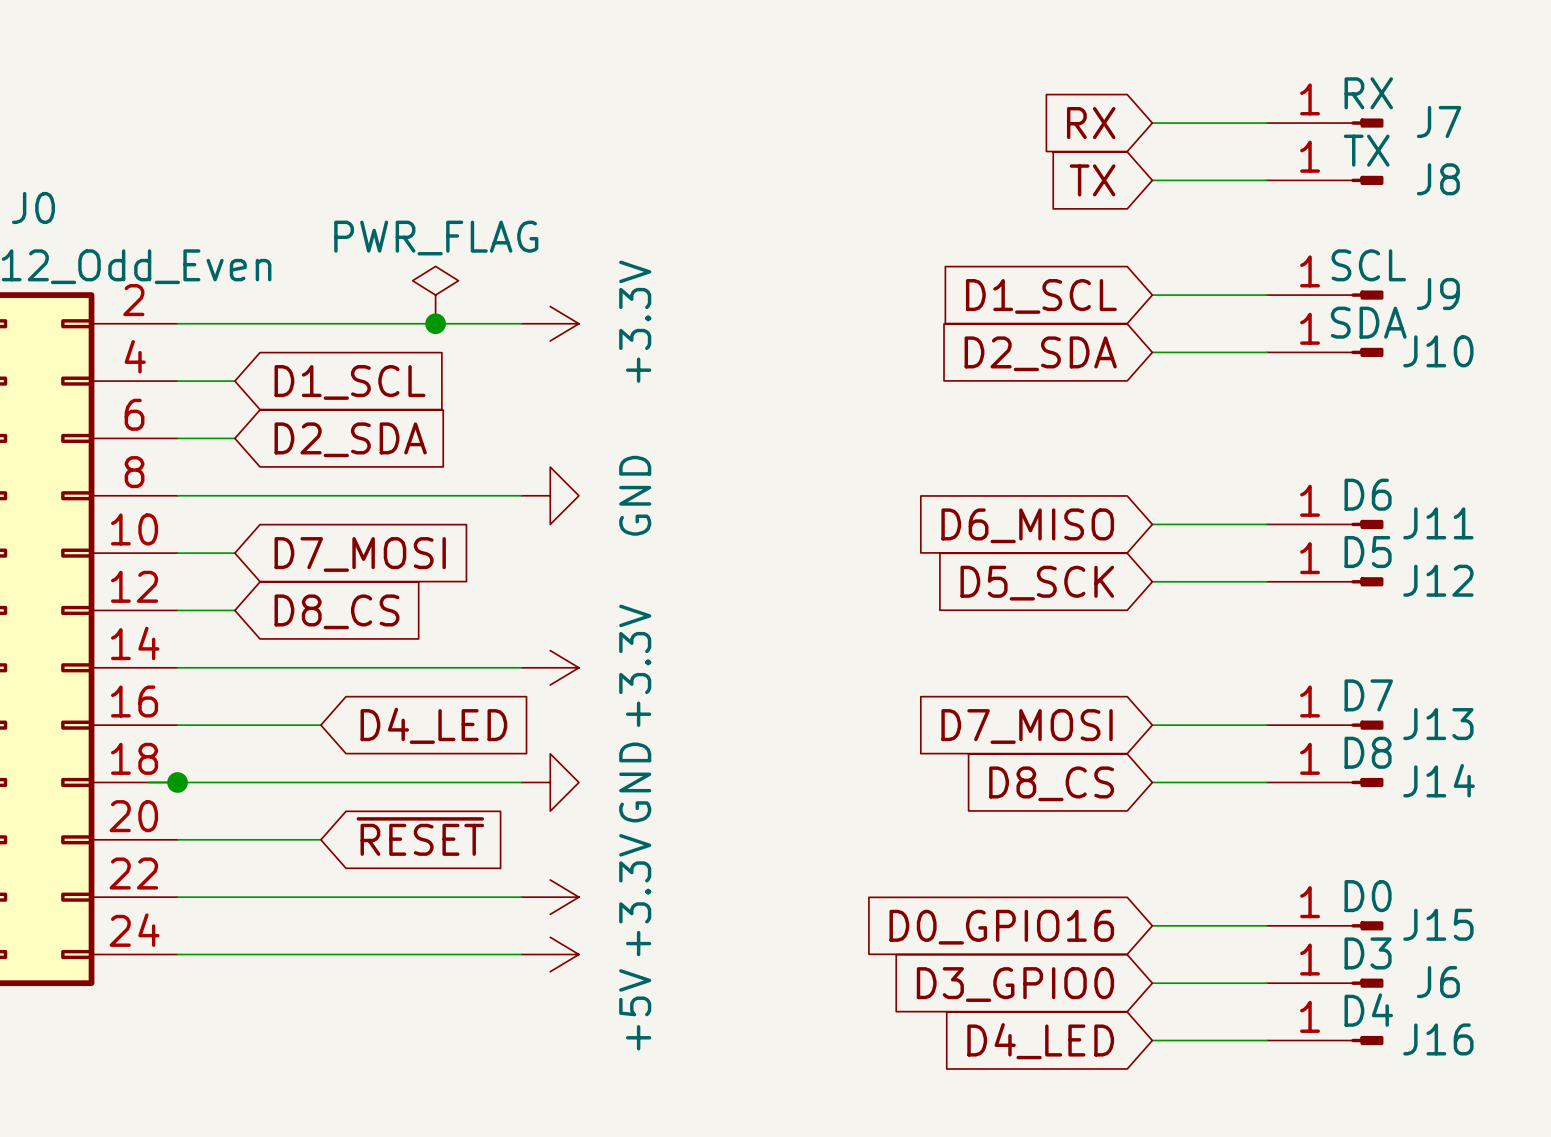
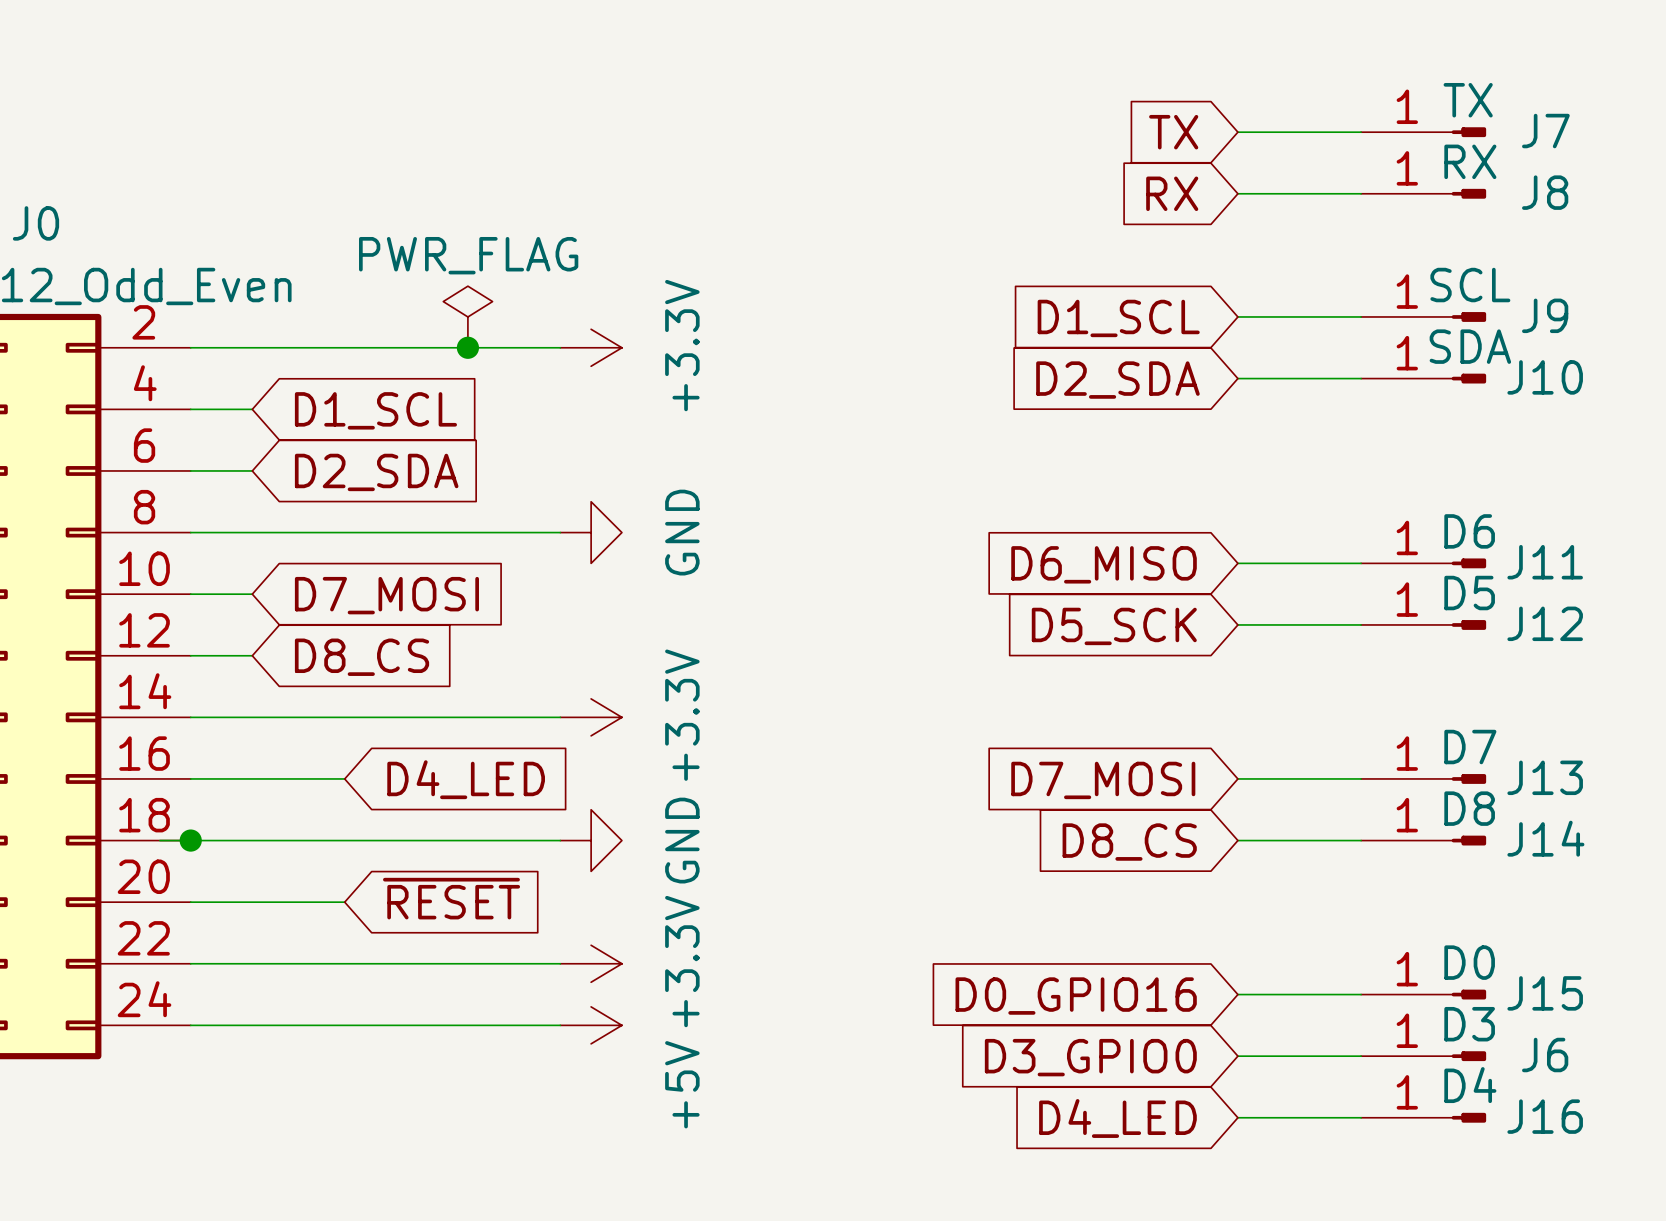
J7 value: RX (1368, 93) -> TX (1468, 100)
global label: RX (1091, 123) -> TX (1173, 132)
J8 value: TX (1366, 150) -> RX (1470, 161)
global label: TX (1092, 180) -> RX (1172, 193)

